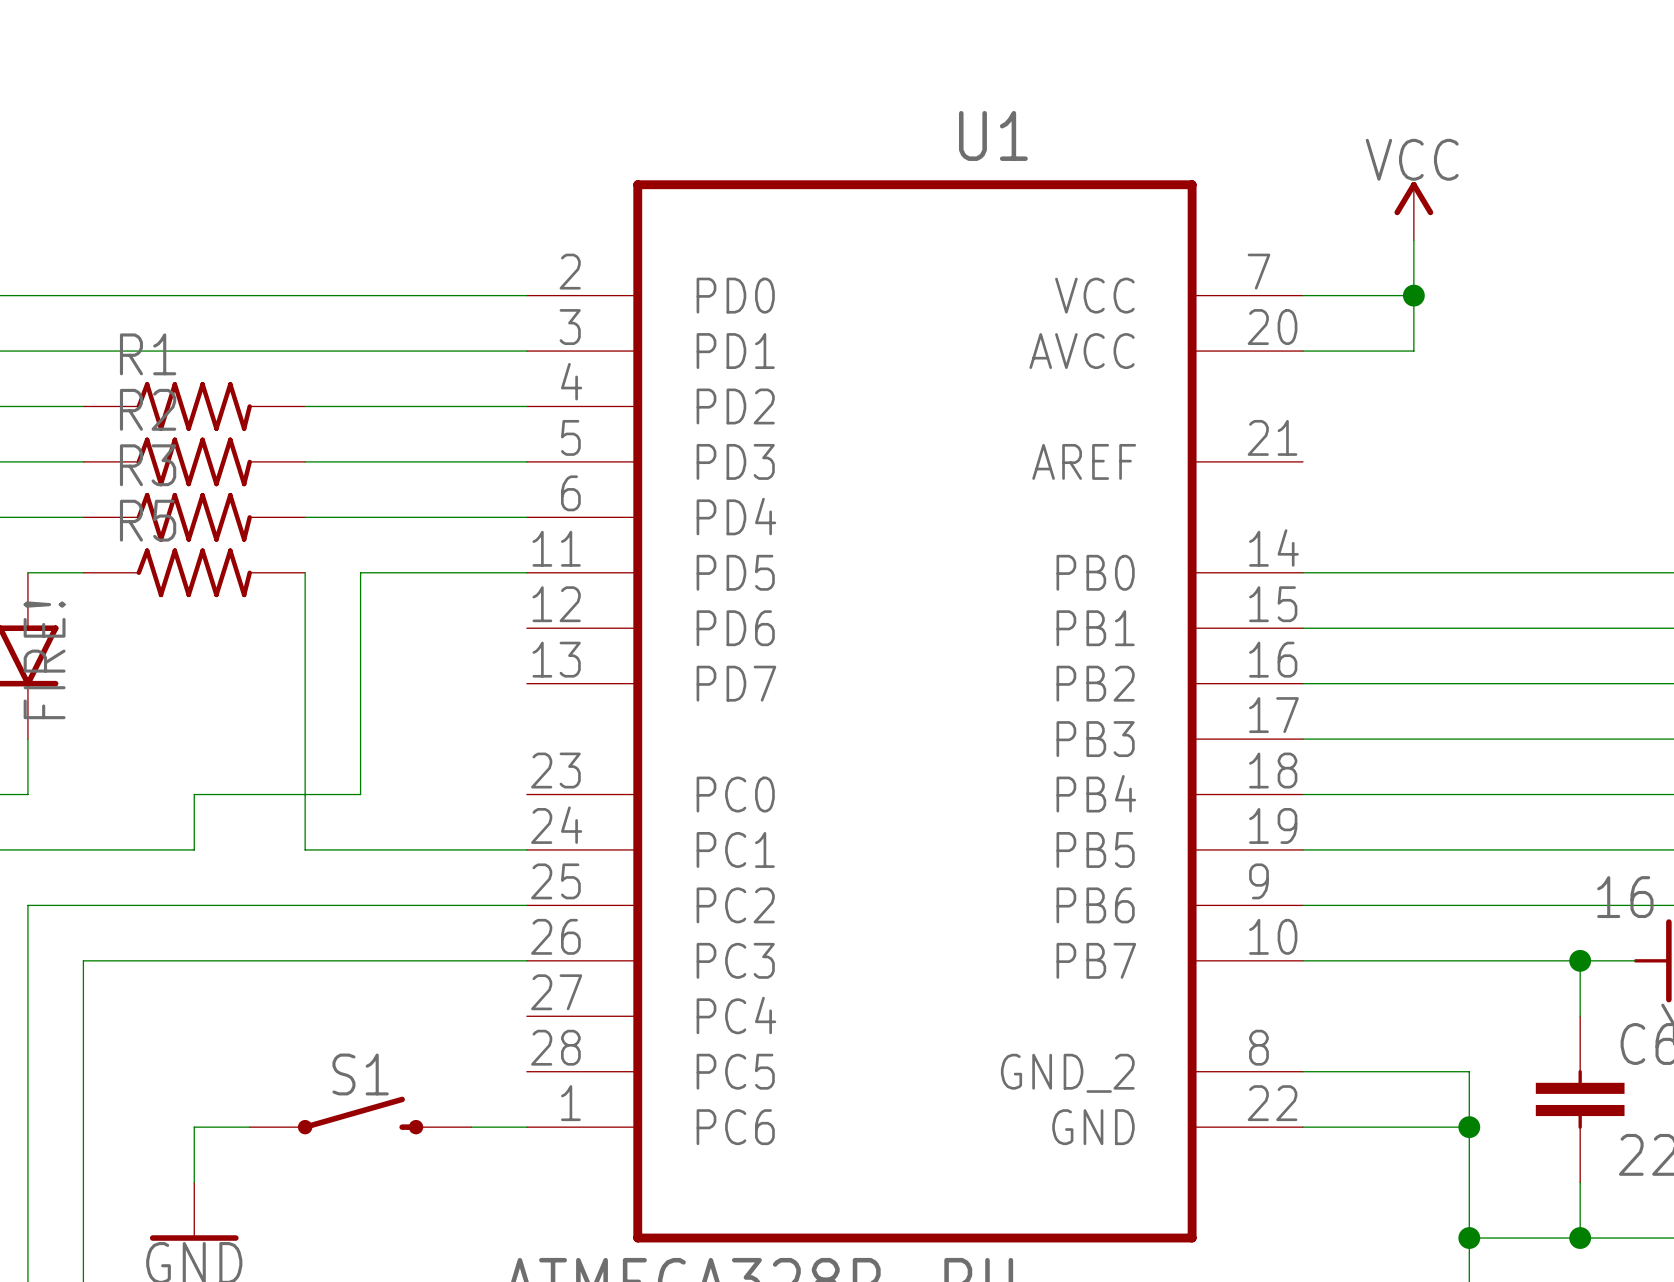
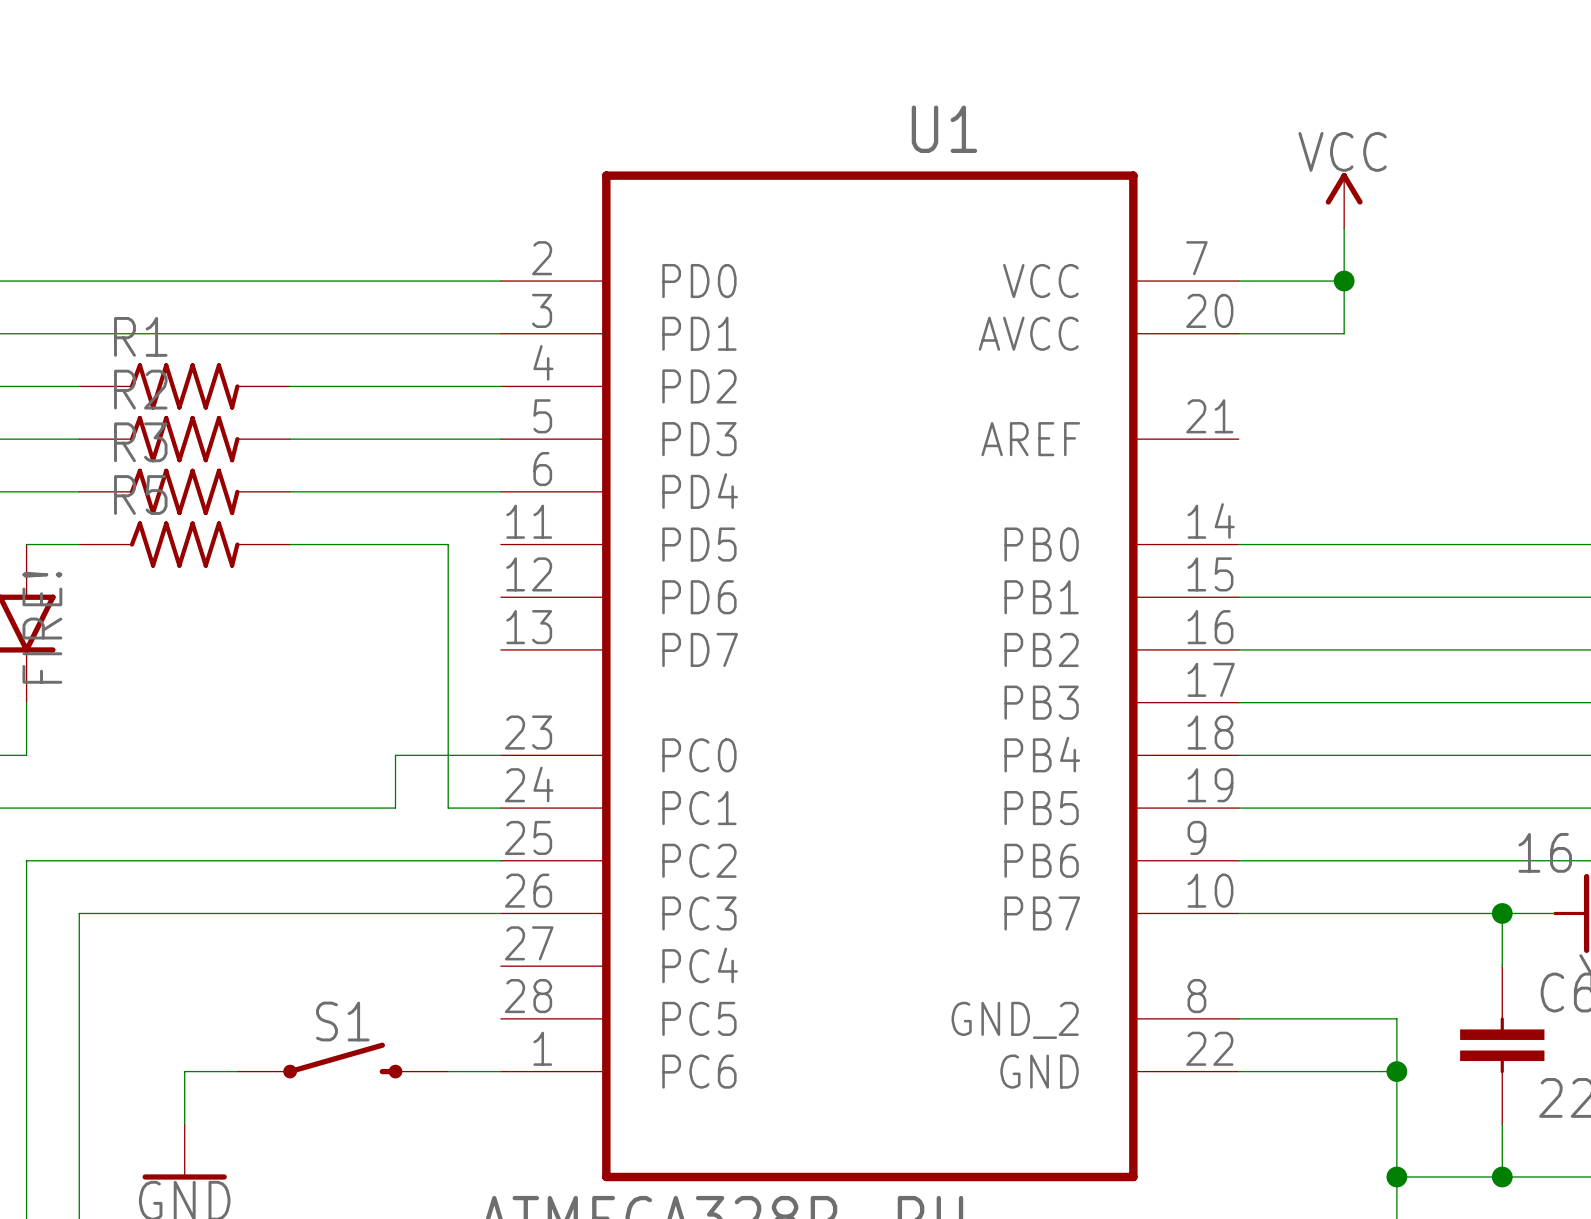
wire: (305, 572) (305, 849) -> (290, 544) (342, 544)
wire: (360, 572) (360, 794) (194, 794) (194, 849) -> (290, 808) (184, 808)
wire: (471, 572) (526, 572) -> (448, 544) (448, 808)
wire: (416, 849) (471, 849) -> (395, 808) (395, 755) (500, 755)

